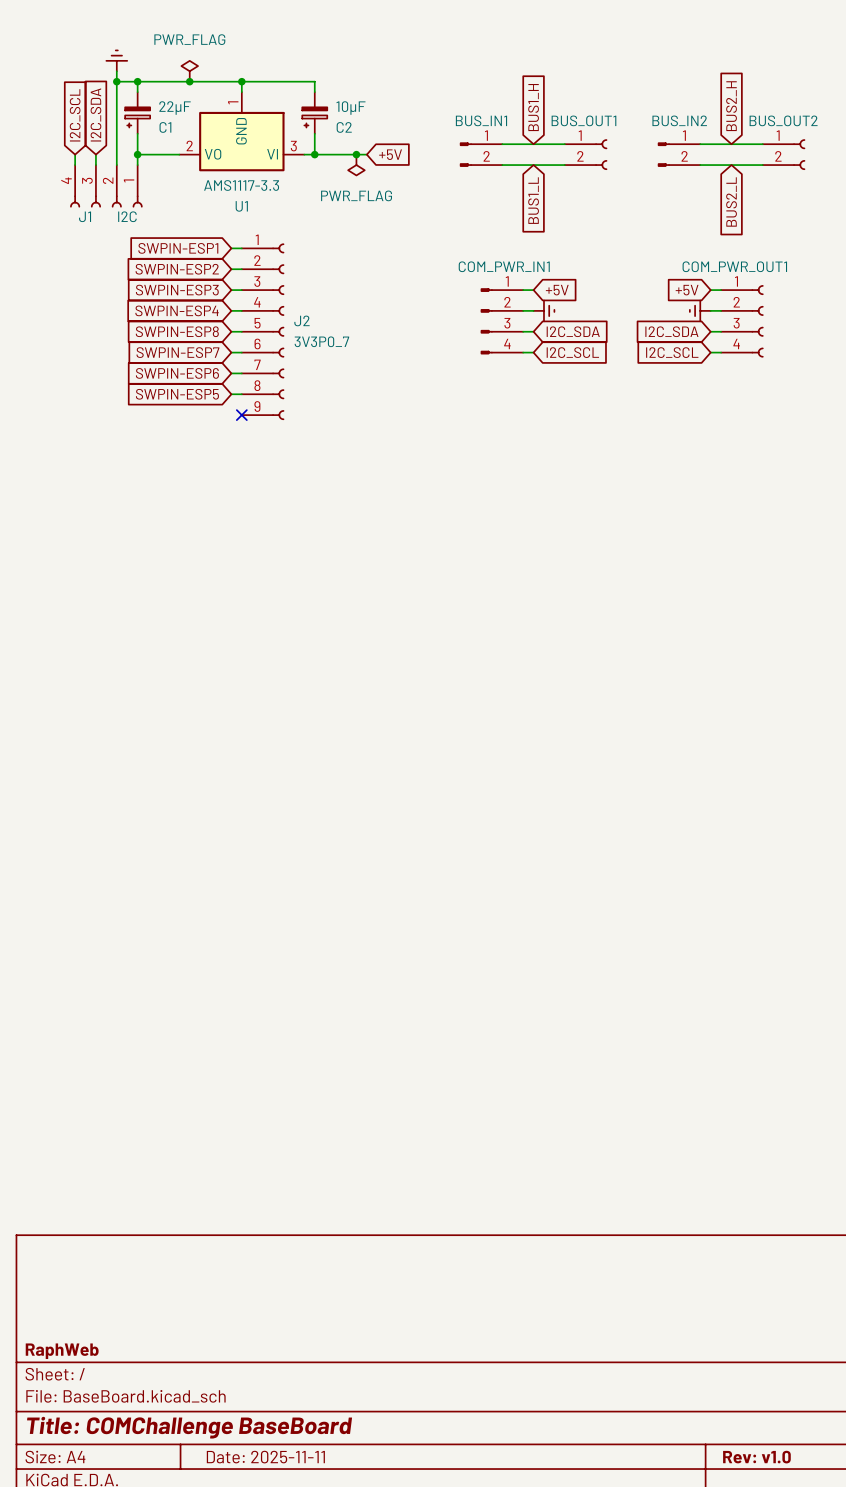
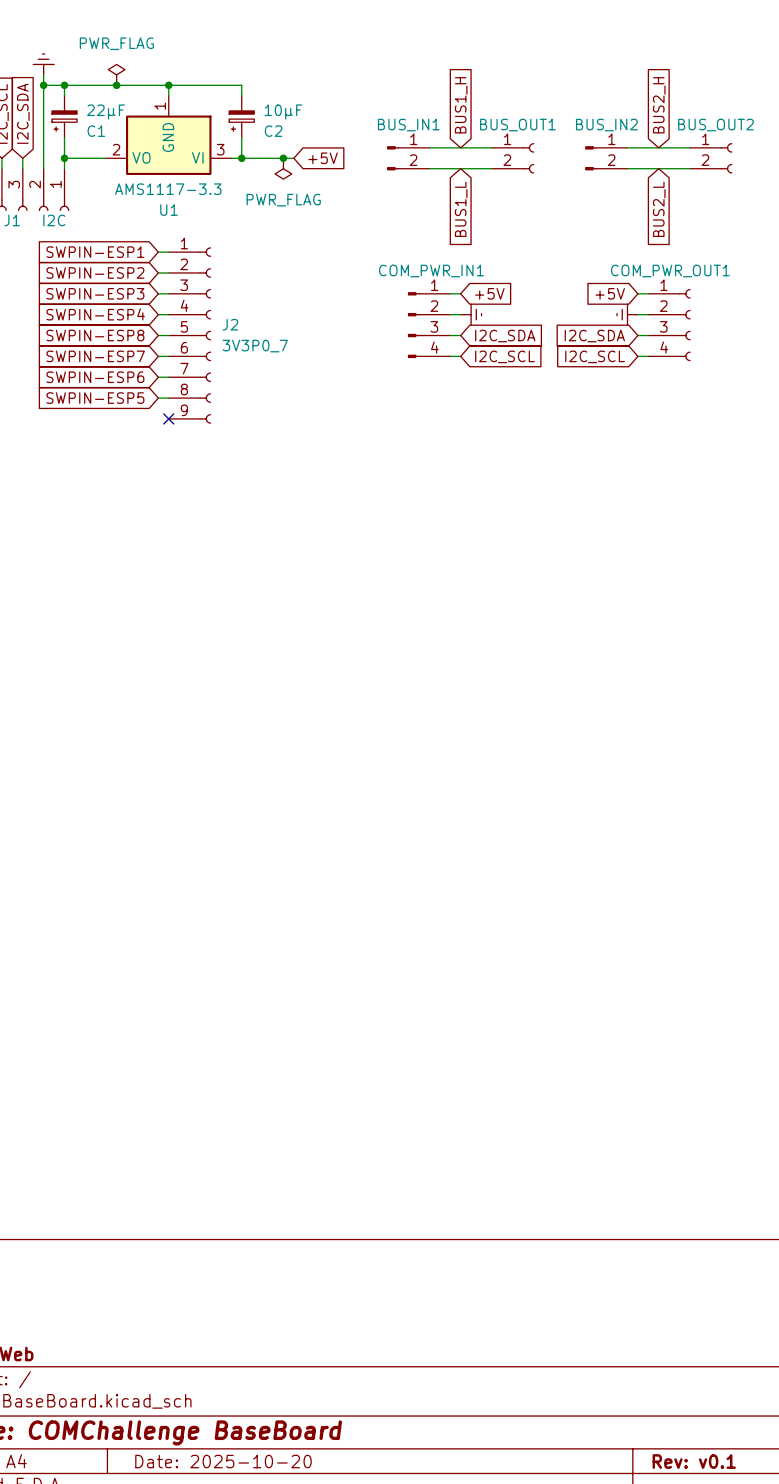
title block: Date: 2025-11-11 (265, 1457) -> Date: 2025-10-20 (223, 1461)
title block: Rev: v1.0 (756, 1457) -> Rev: v0.1 (694, 1461)

